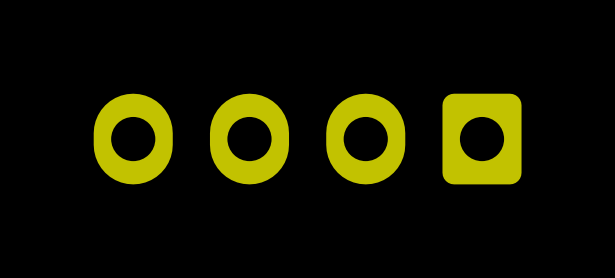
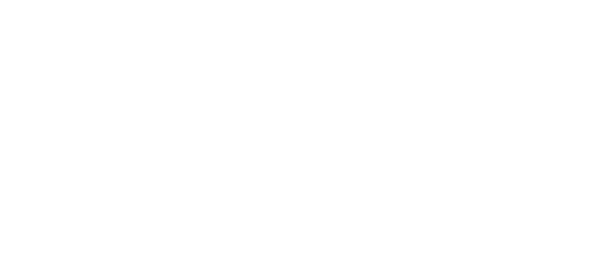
part: (307, 139) -> none

